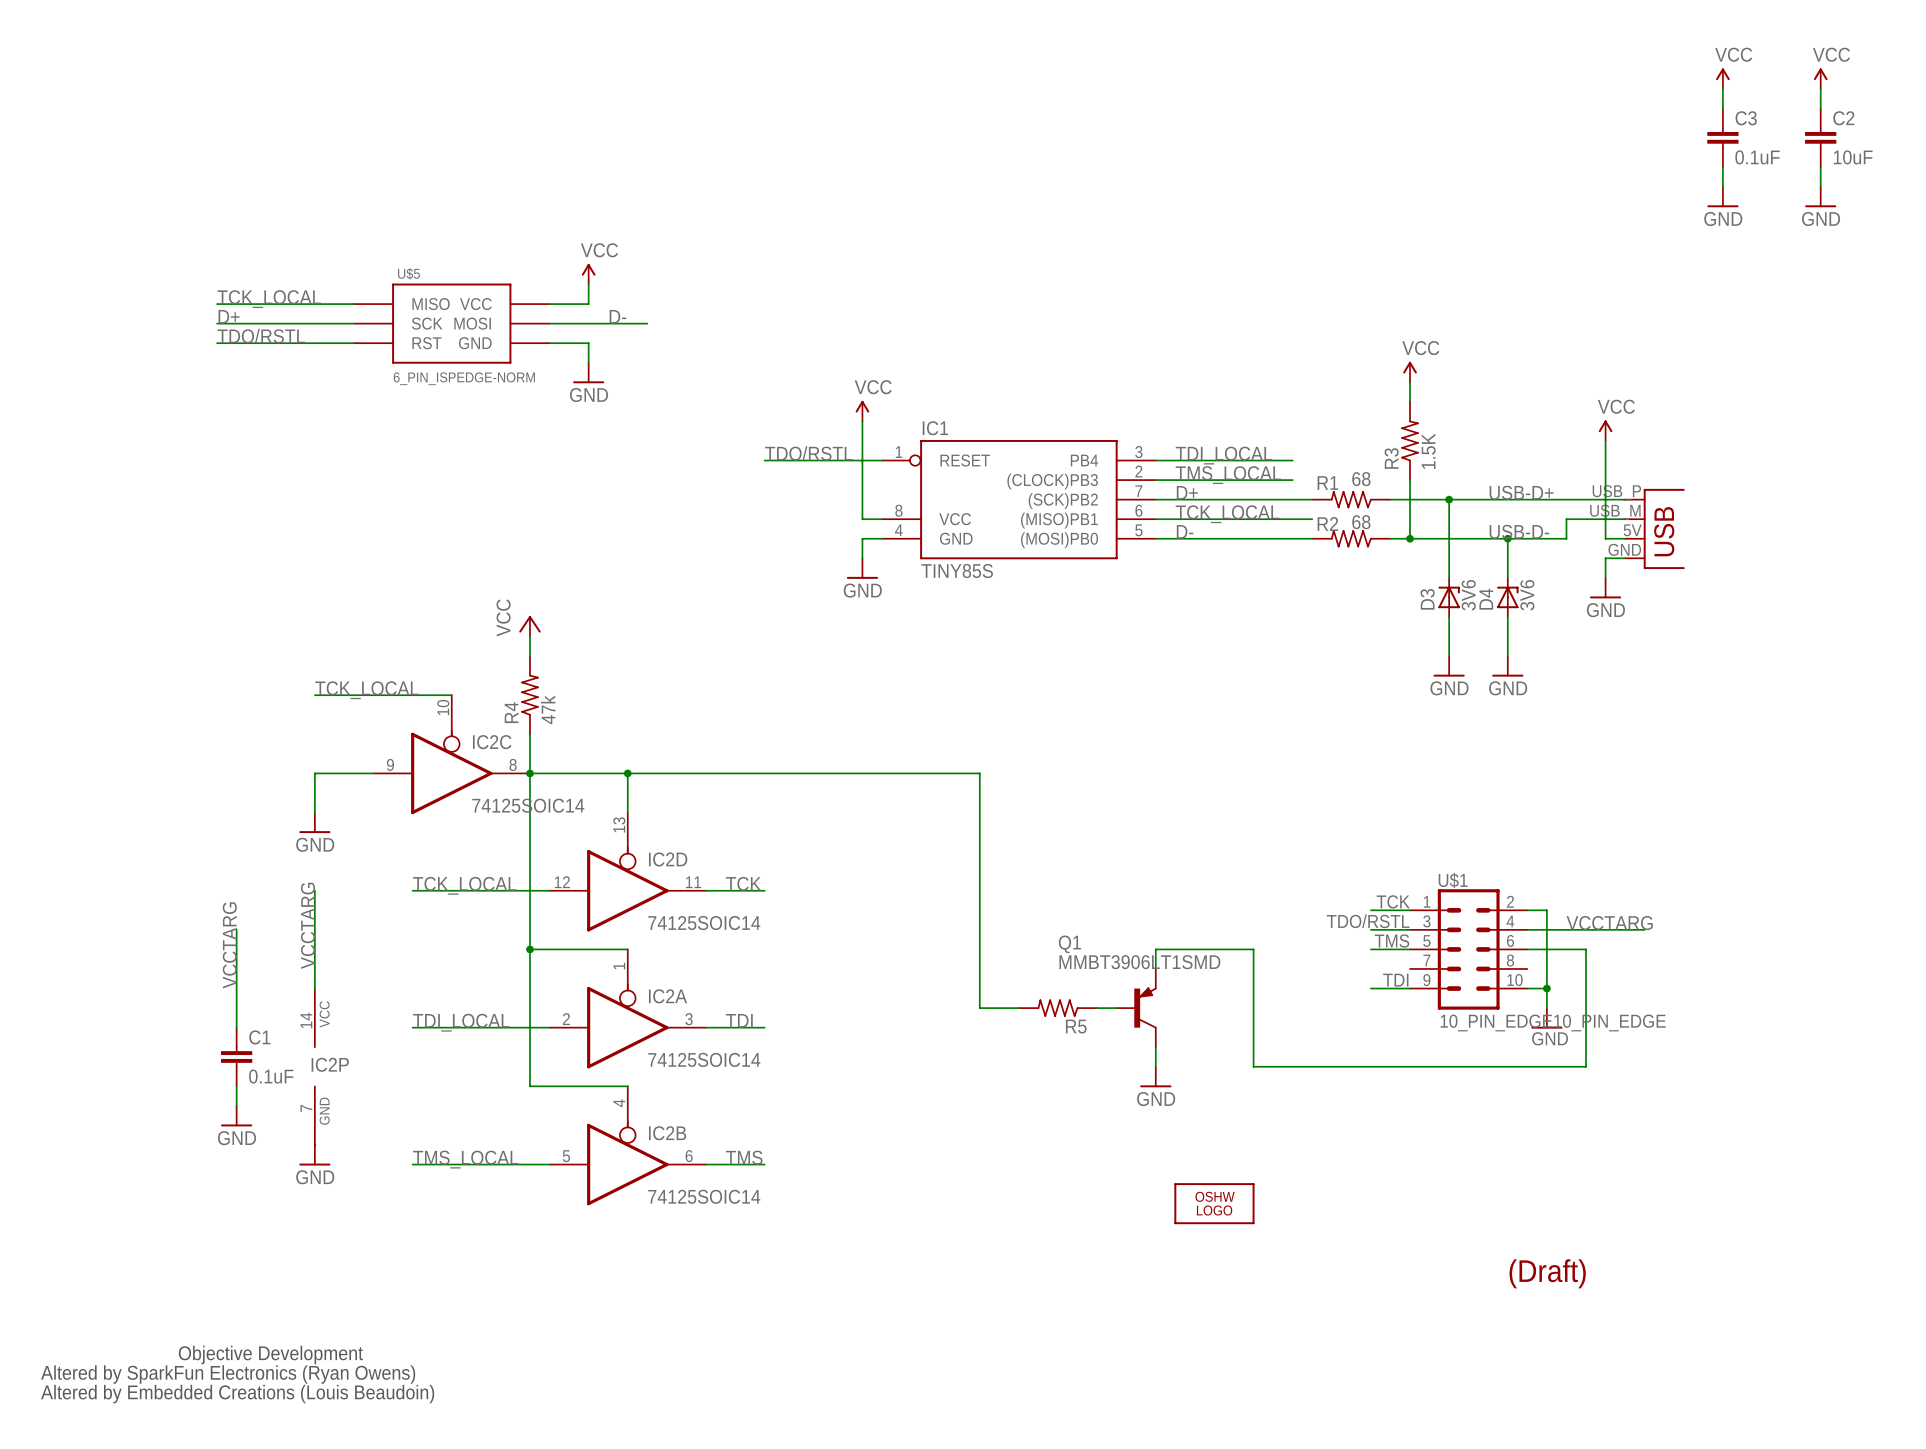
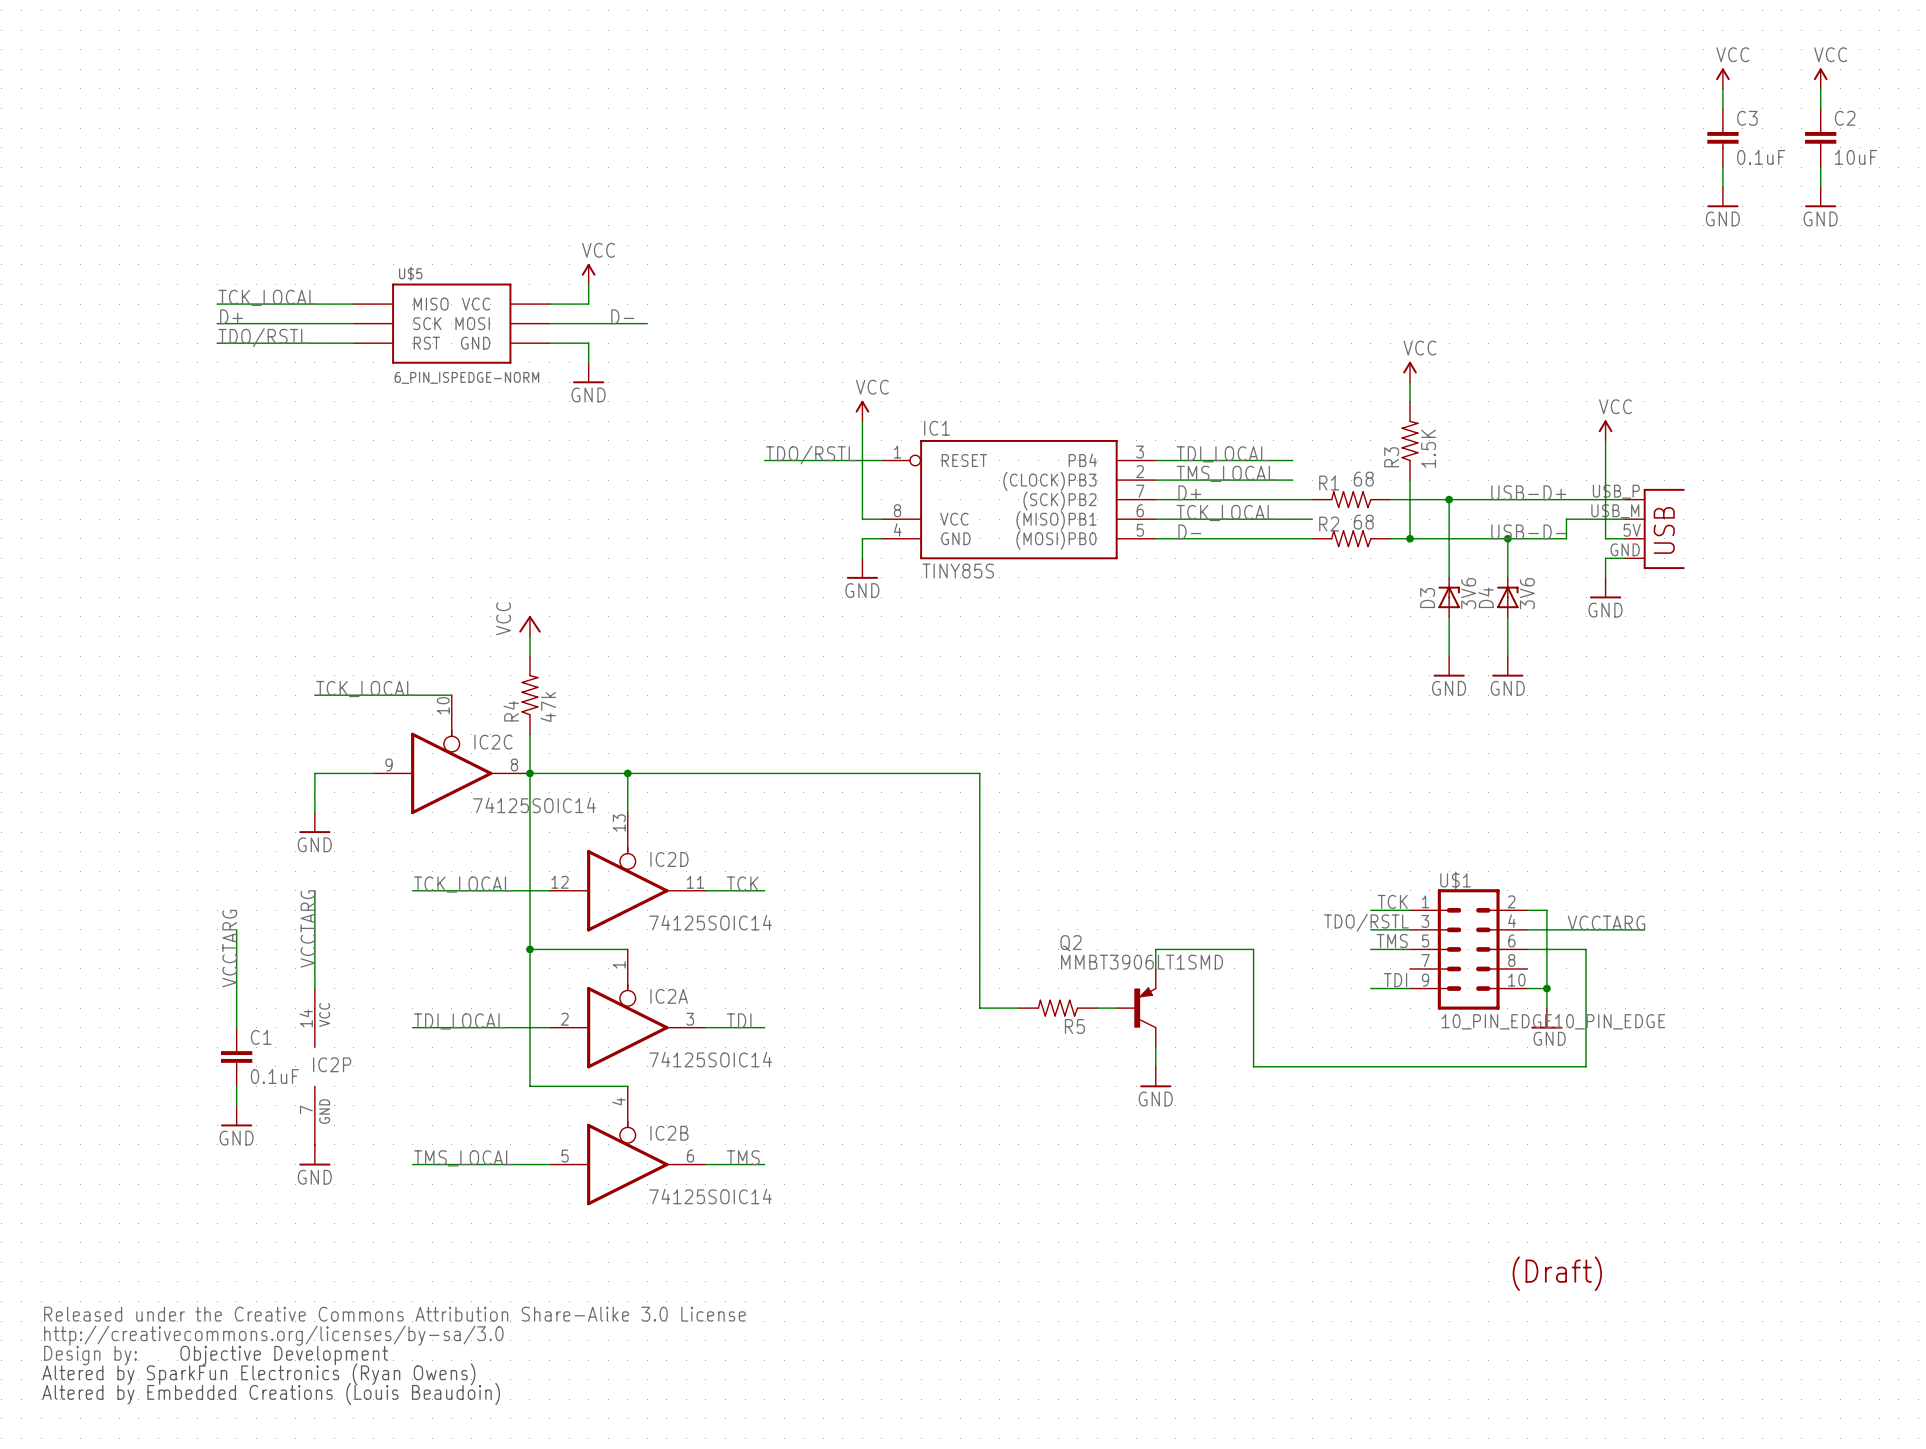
Q1 name: Q1 (1069, 944) -> Q2 (1071, 943)
part: (1214, 1203) -> none
part: none -> (394, 1335)

